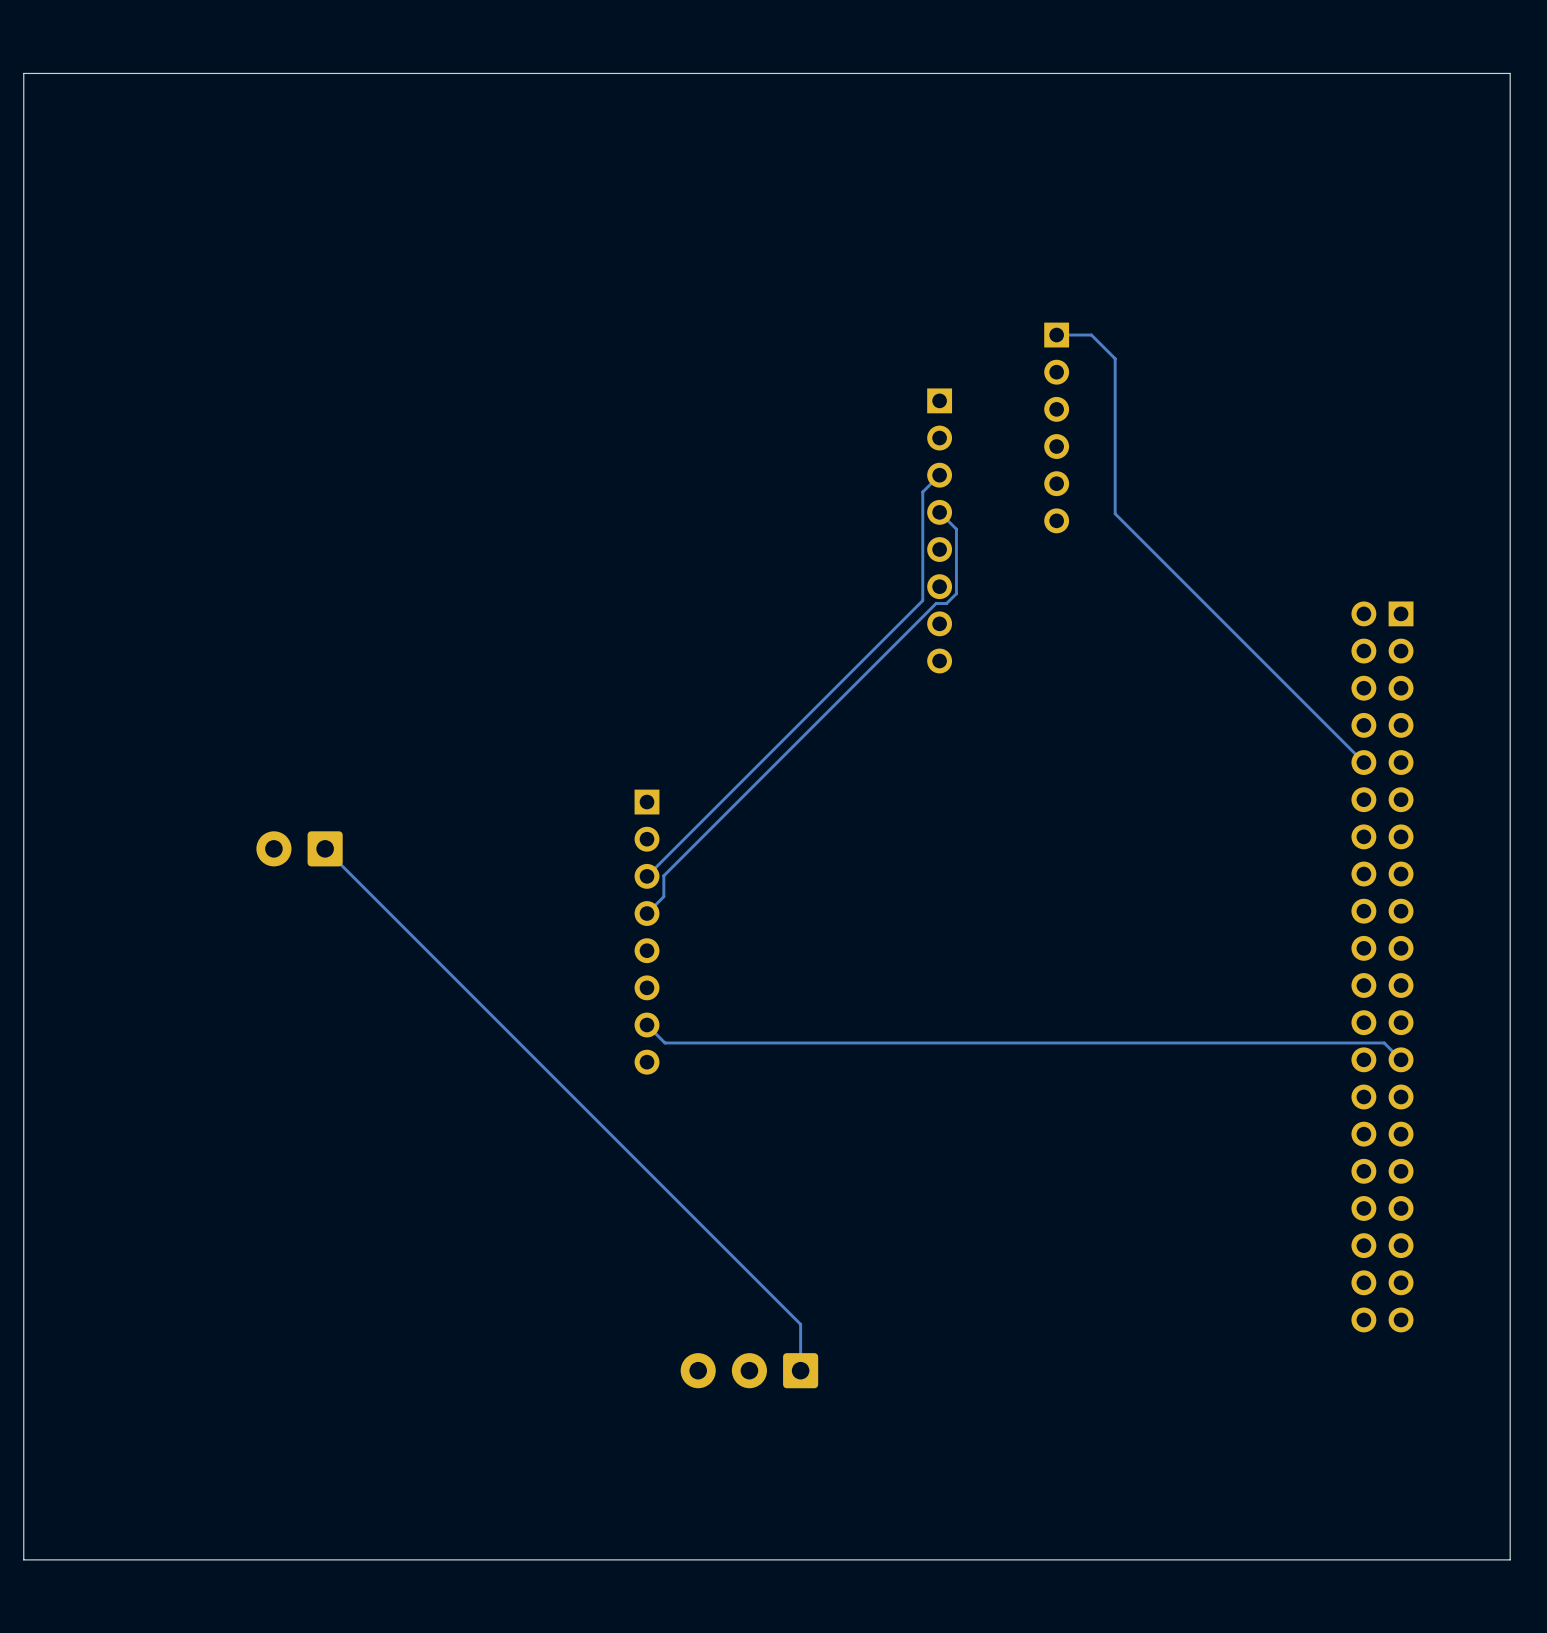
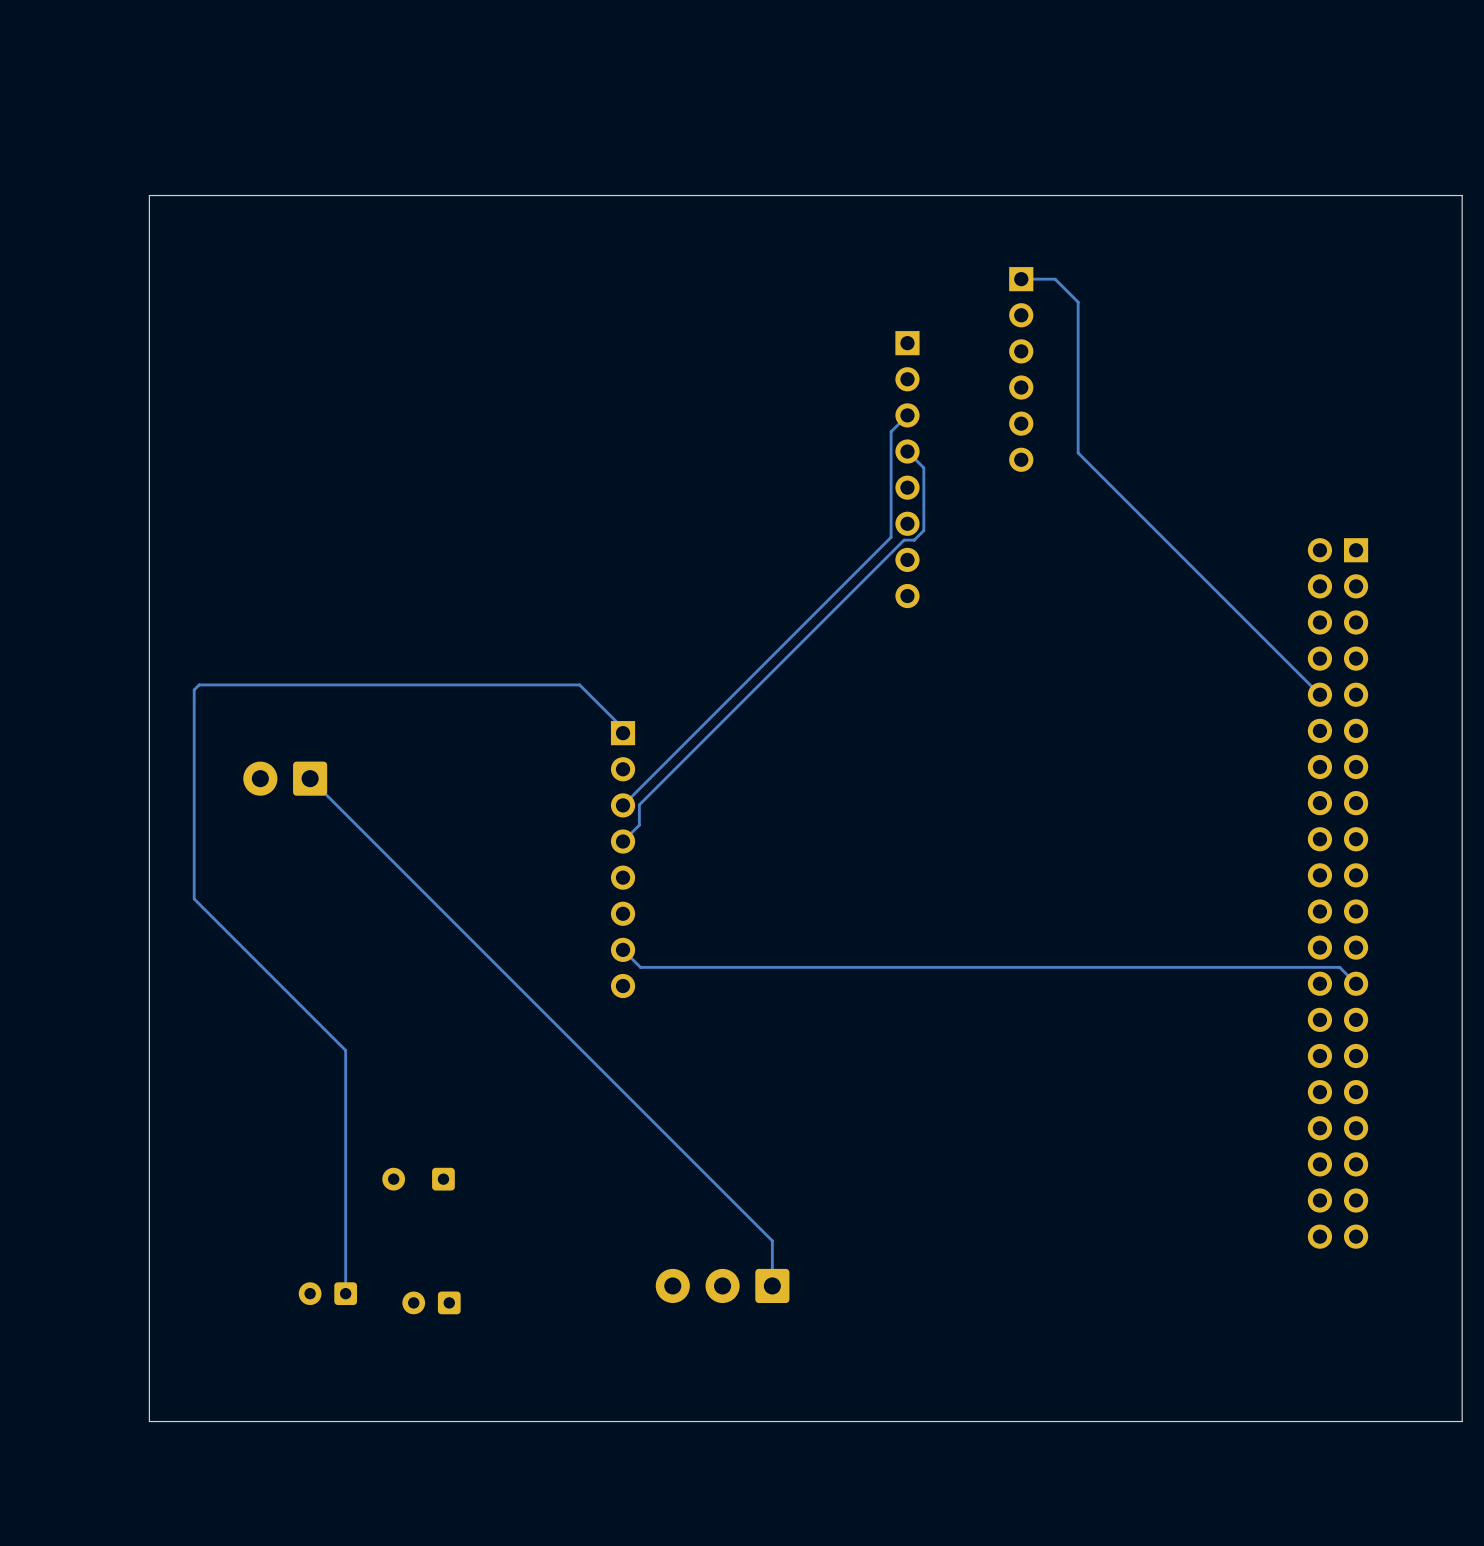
board edge: (1510, 249) (1510, 73) (23, 73) (23, 1559) (1510, 1559) (1510, 1510) -> (1462, 195) (149, 195) (149, 1421) (1462, 1421)
track: none -> (623, 733) (623, 728) (579, 684) (199, 684) (194, 689) (194, 898) (345, 1050) (345, 1293)
part: none -> (418, 1179)
part: none -> (327, 1293)
part: none -> (431, 1302)

